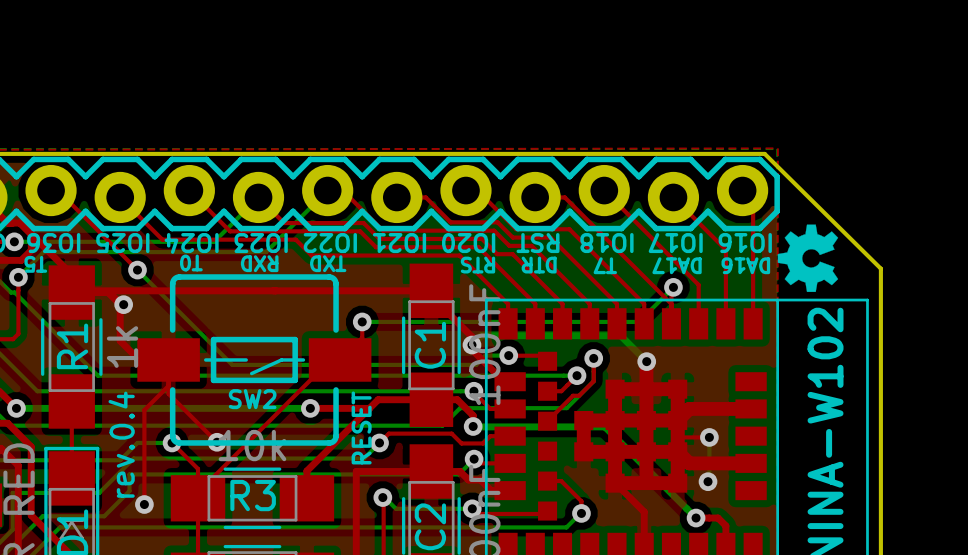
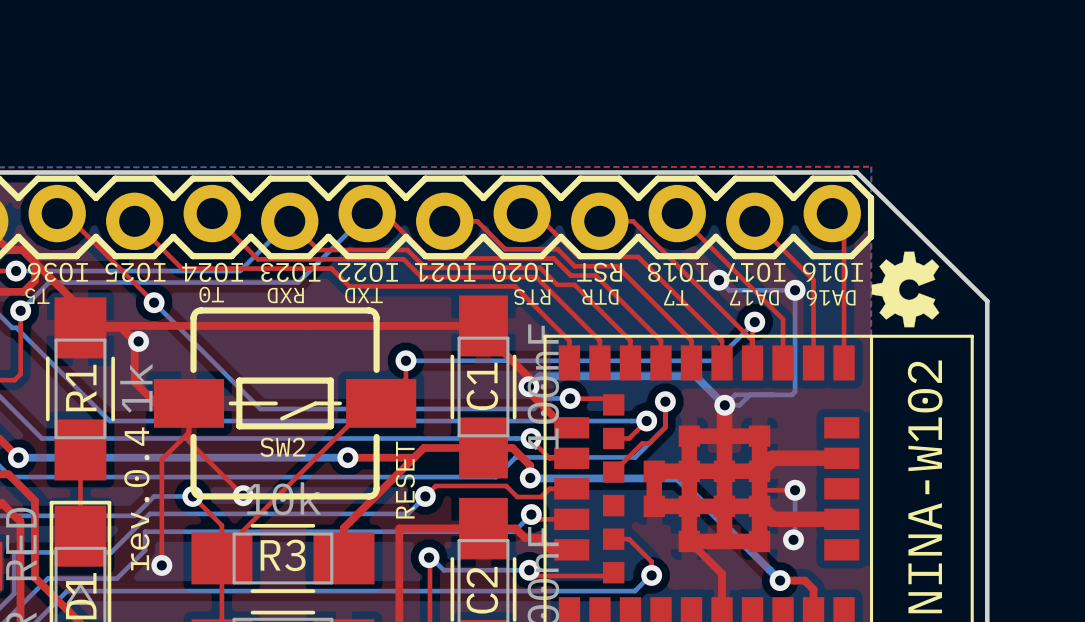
bottom track: none -> (719, 280) (729, 290) (795, 290) (795, 391) (791, 394) (735, 394) (724, 405) (739, 405) (749, 394)
via: none -> (719, 280)
via: none -> (795, 290)

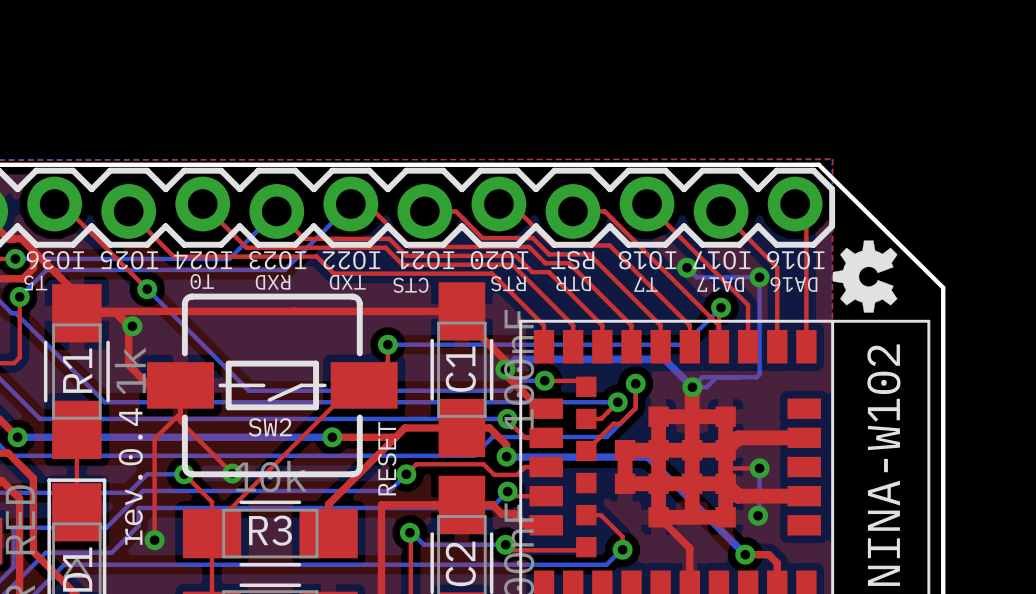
text: none -> CTS (410, 285)

